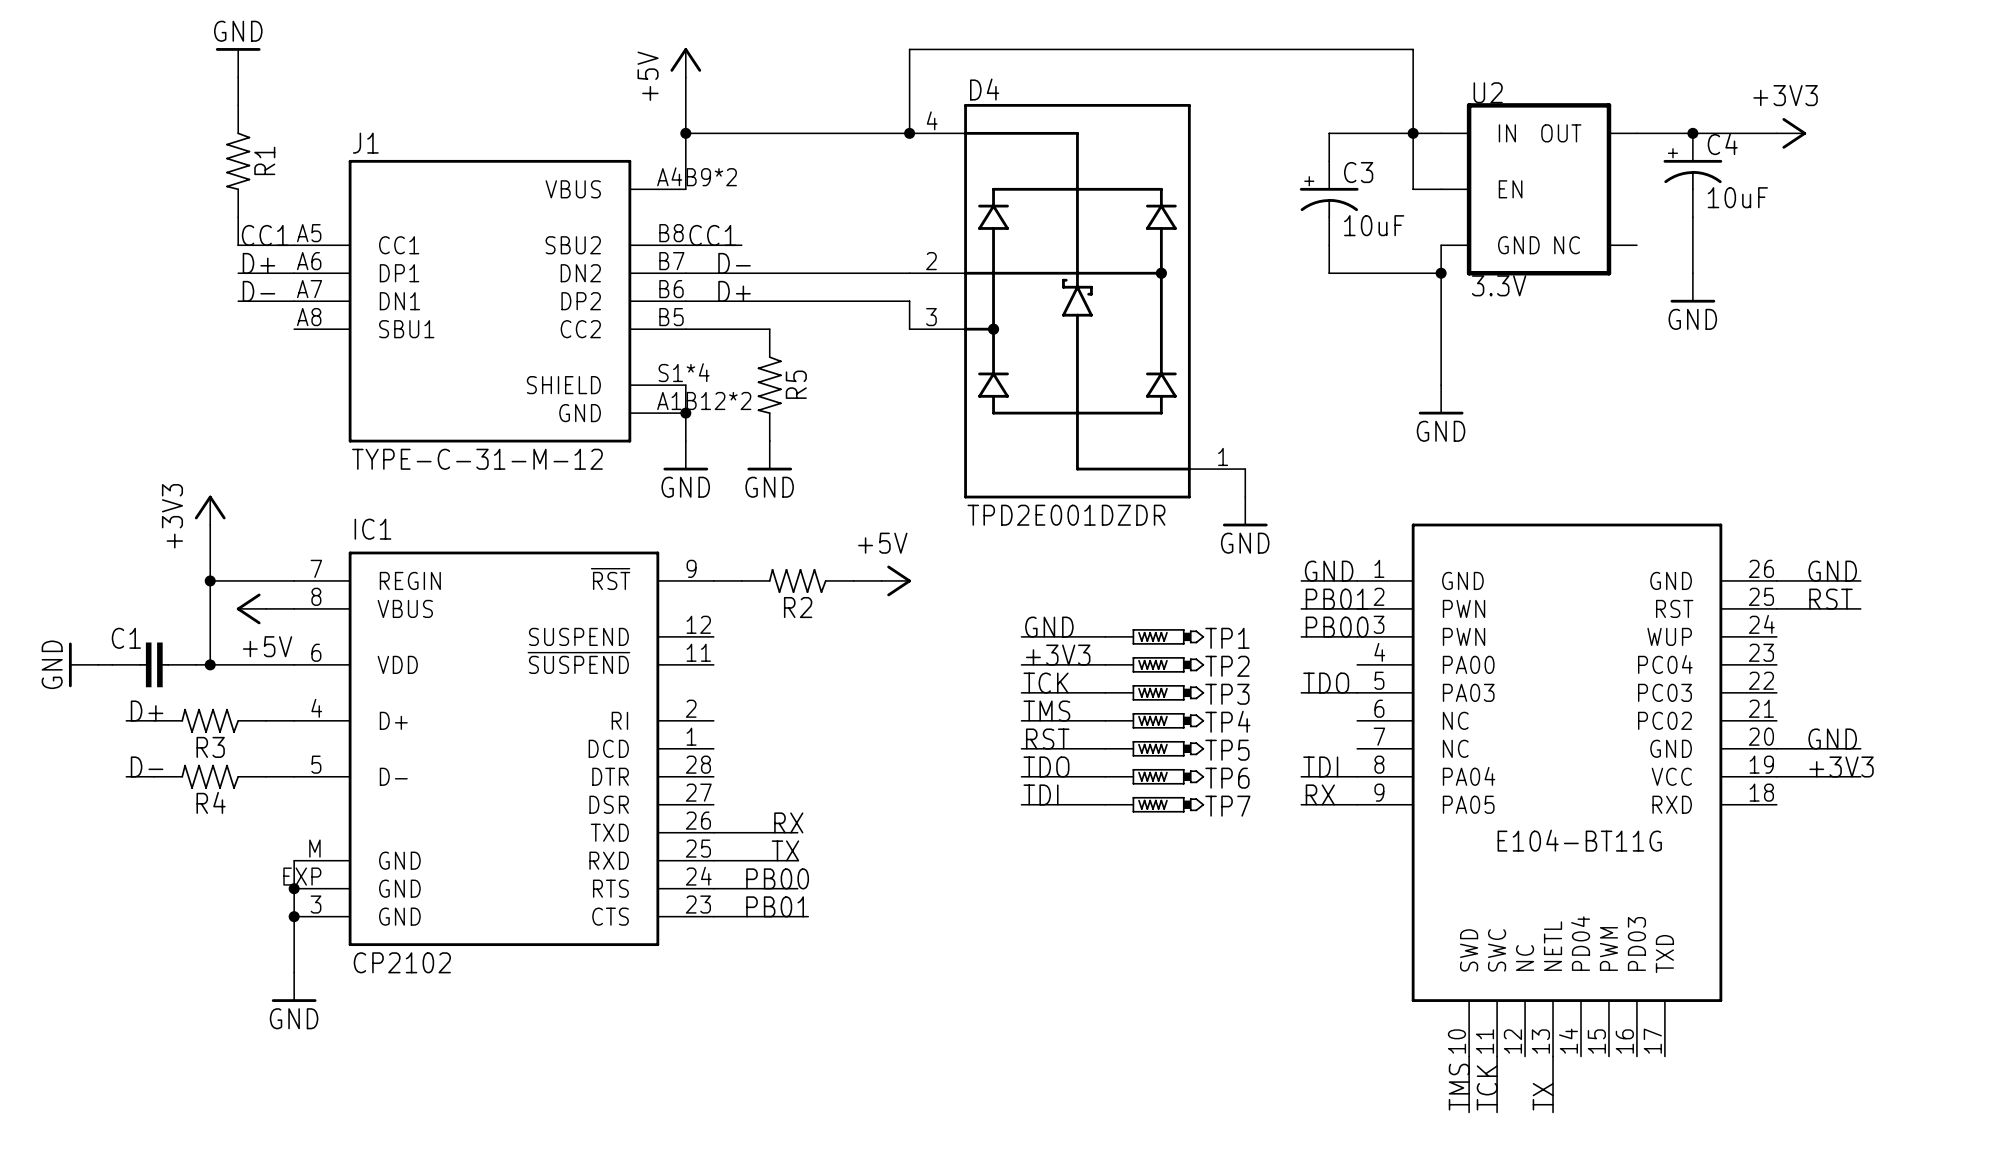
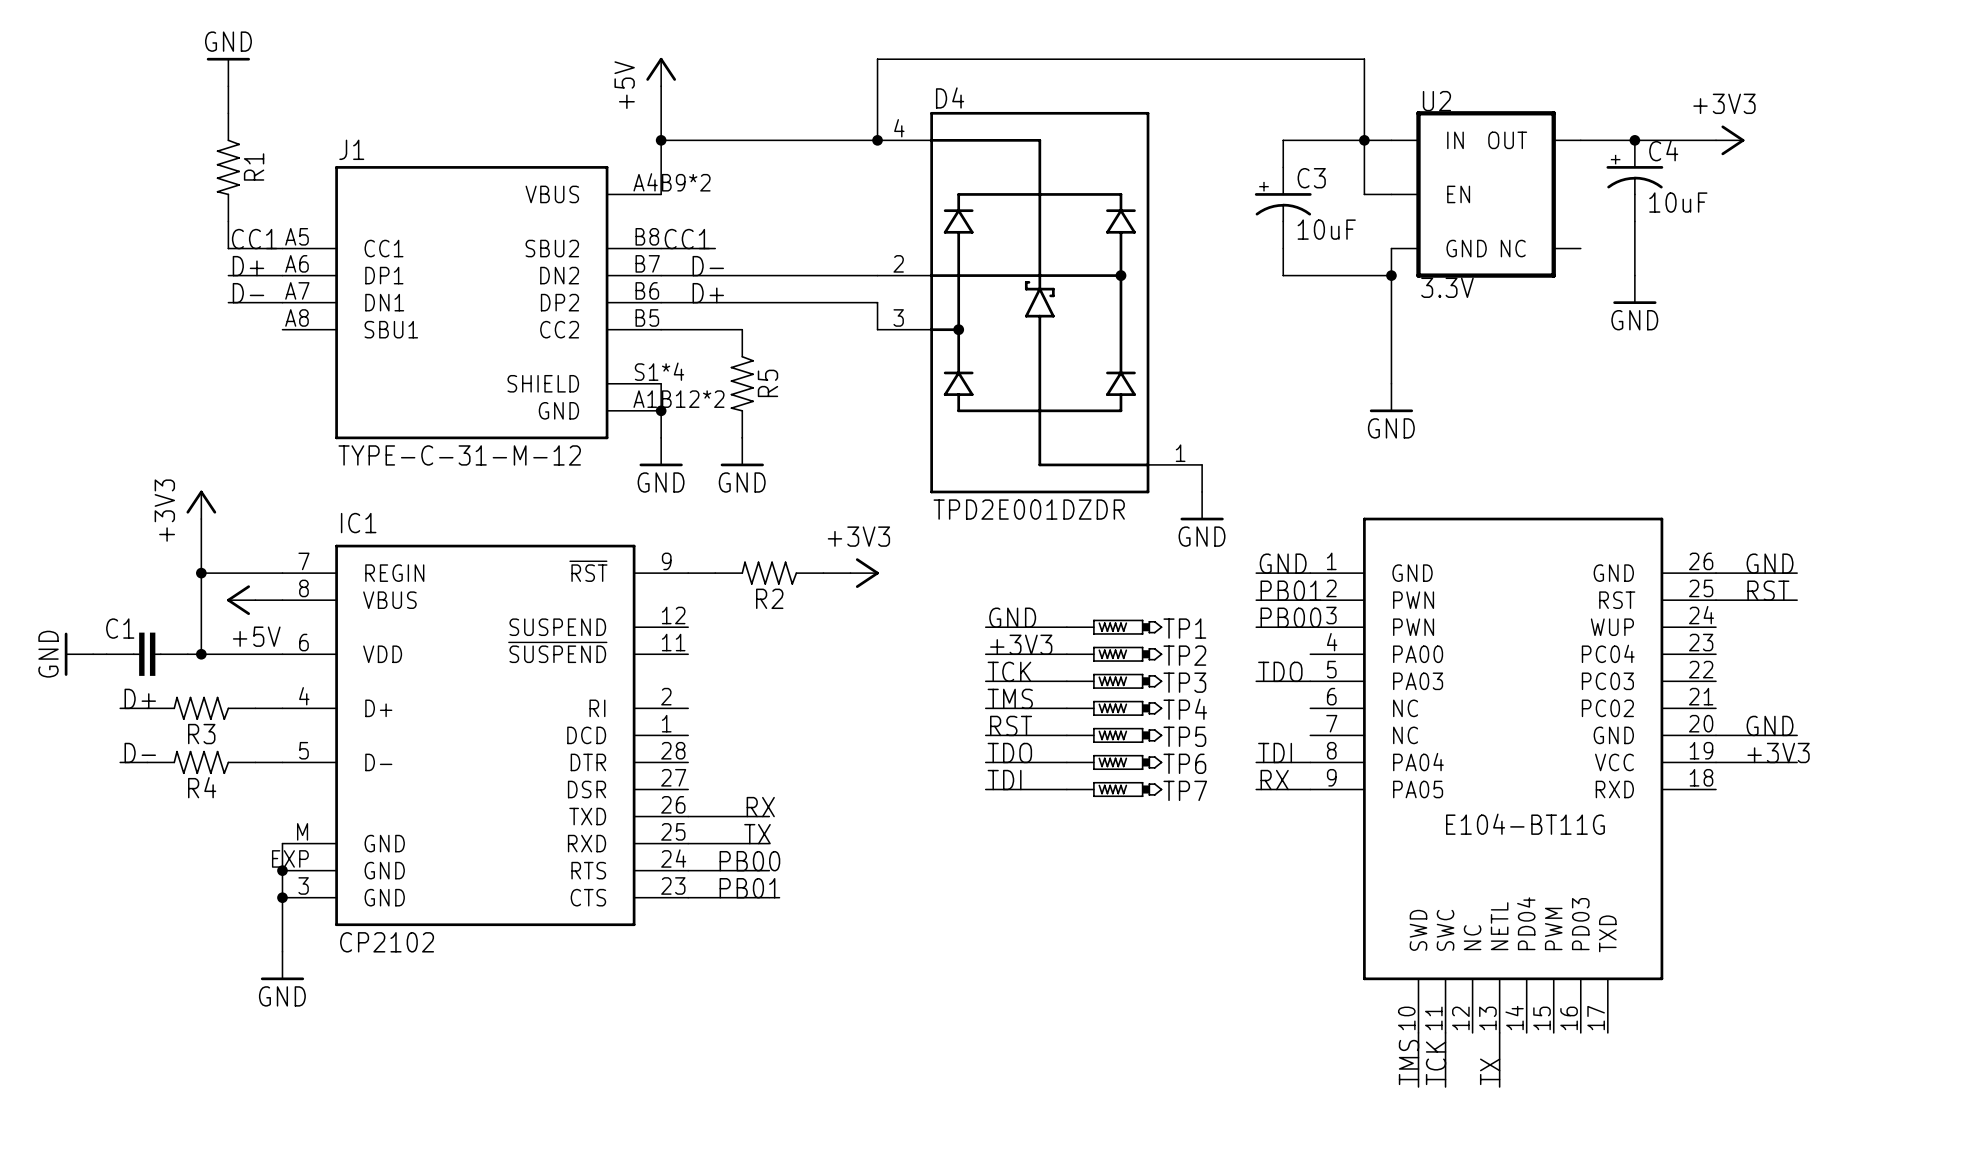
power symbol: +5V (896, 580) -> +3V3 (864, 573)

